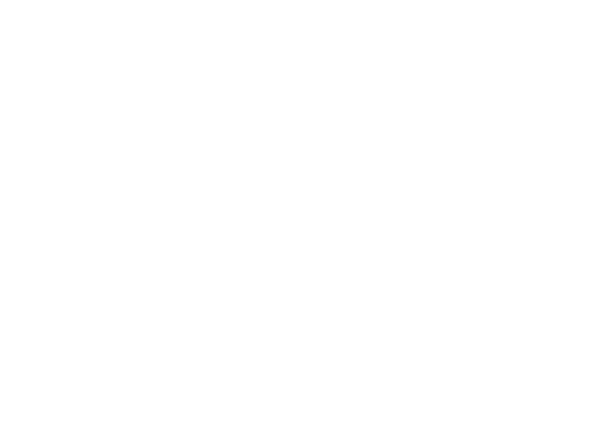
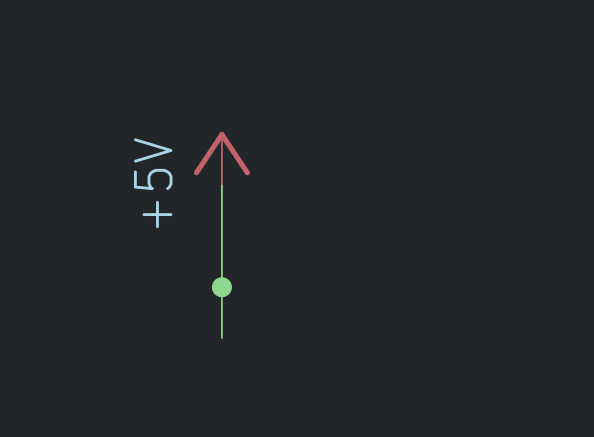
power symbol: none -> +5V (221, 158)
wire: none -> (221, 185) (221, 338)
junction: none -> (221, 287)

